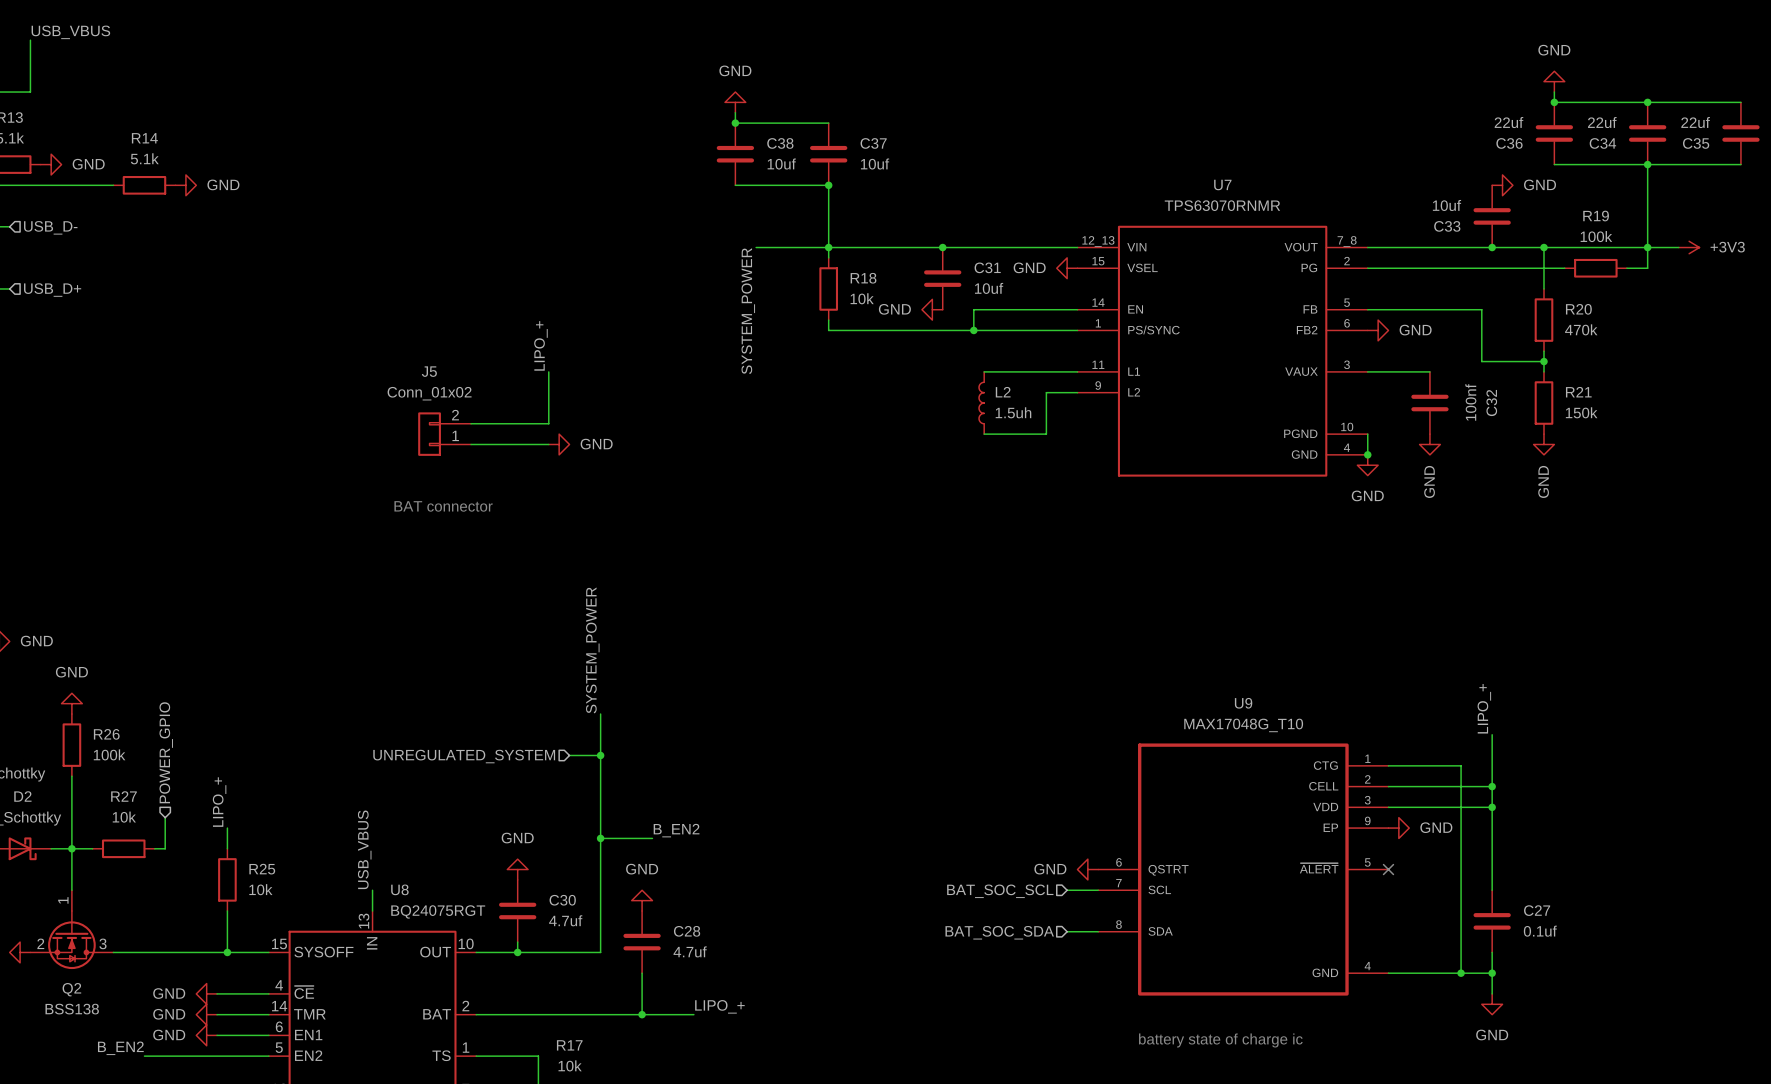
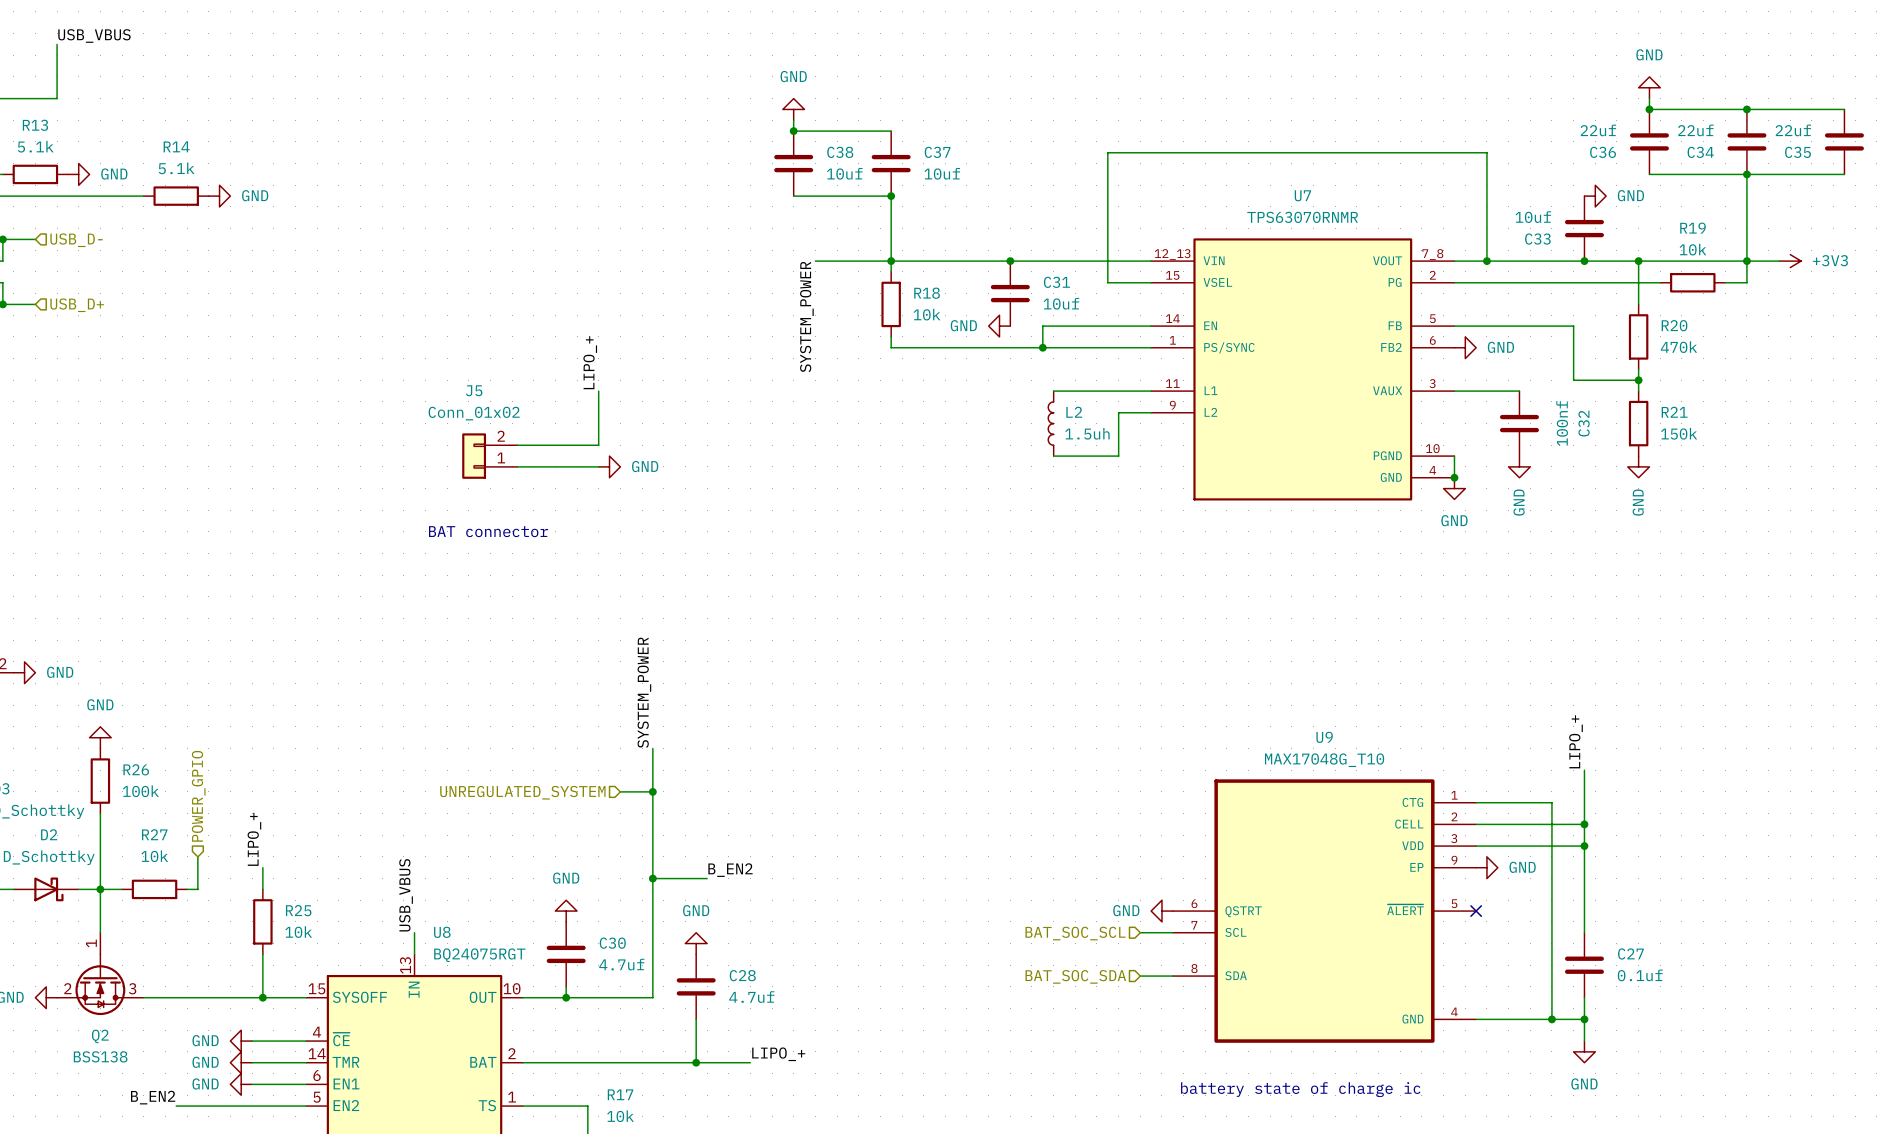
R19 value: 100k (1596, 236) -> 10k (1693, 249)
wire: none -> (1486, 261) (1486, 152) (1107, 152) (1107, 282) (1151, 282)
junction: none -> (1486, 261)
power symbol: GND (1067, 268) -> none

